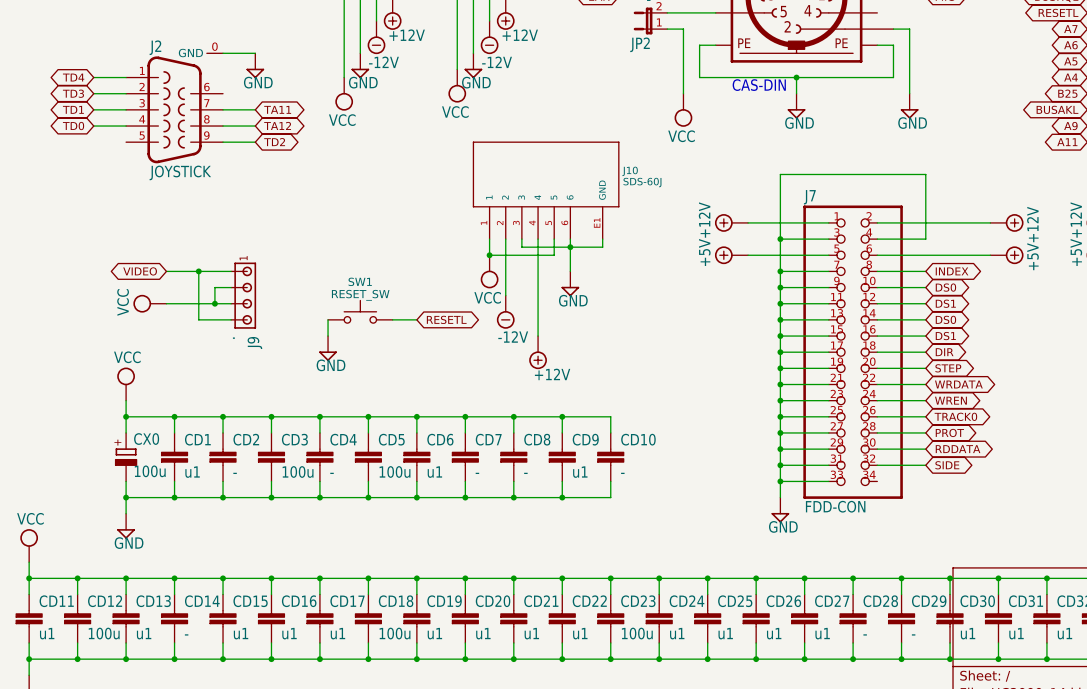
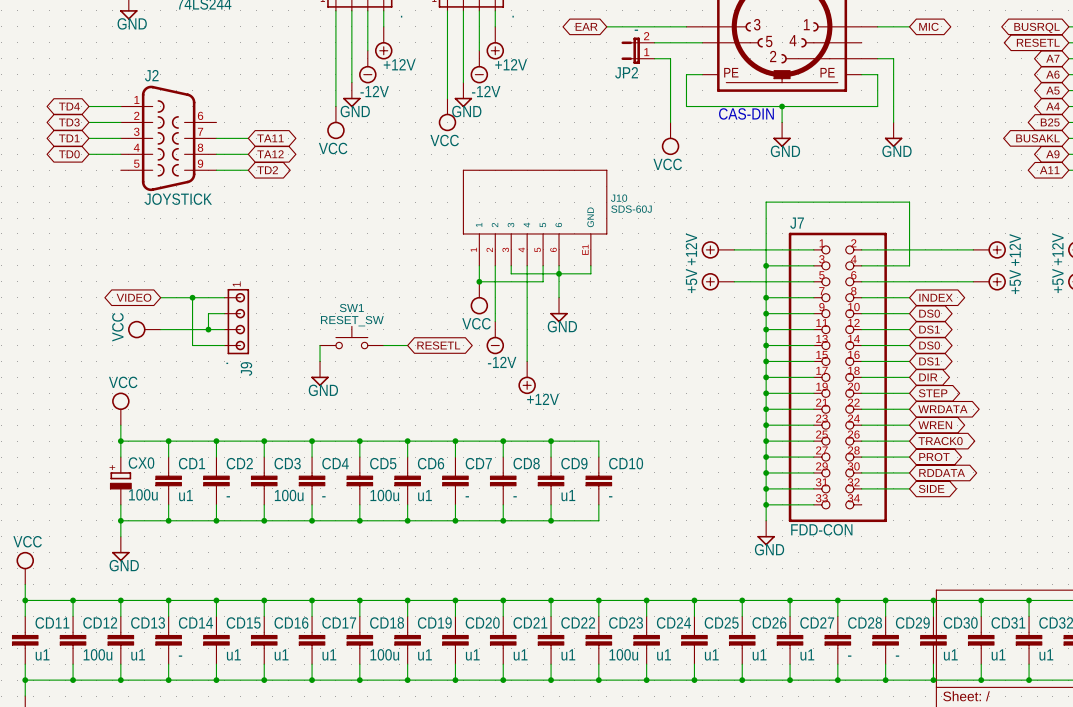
J2 symbol: [126, 53, 224, 164] -> [120, 85, 217, 192]
wire: (223, 53) (255, 53) -> none
power symbol: GND (255, 65) -> none

